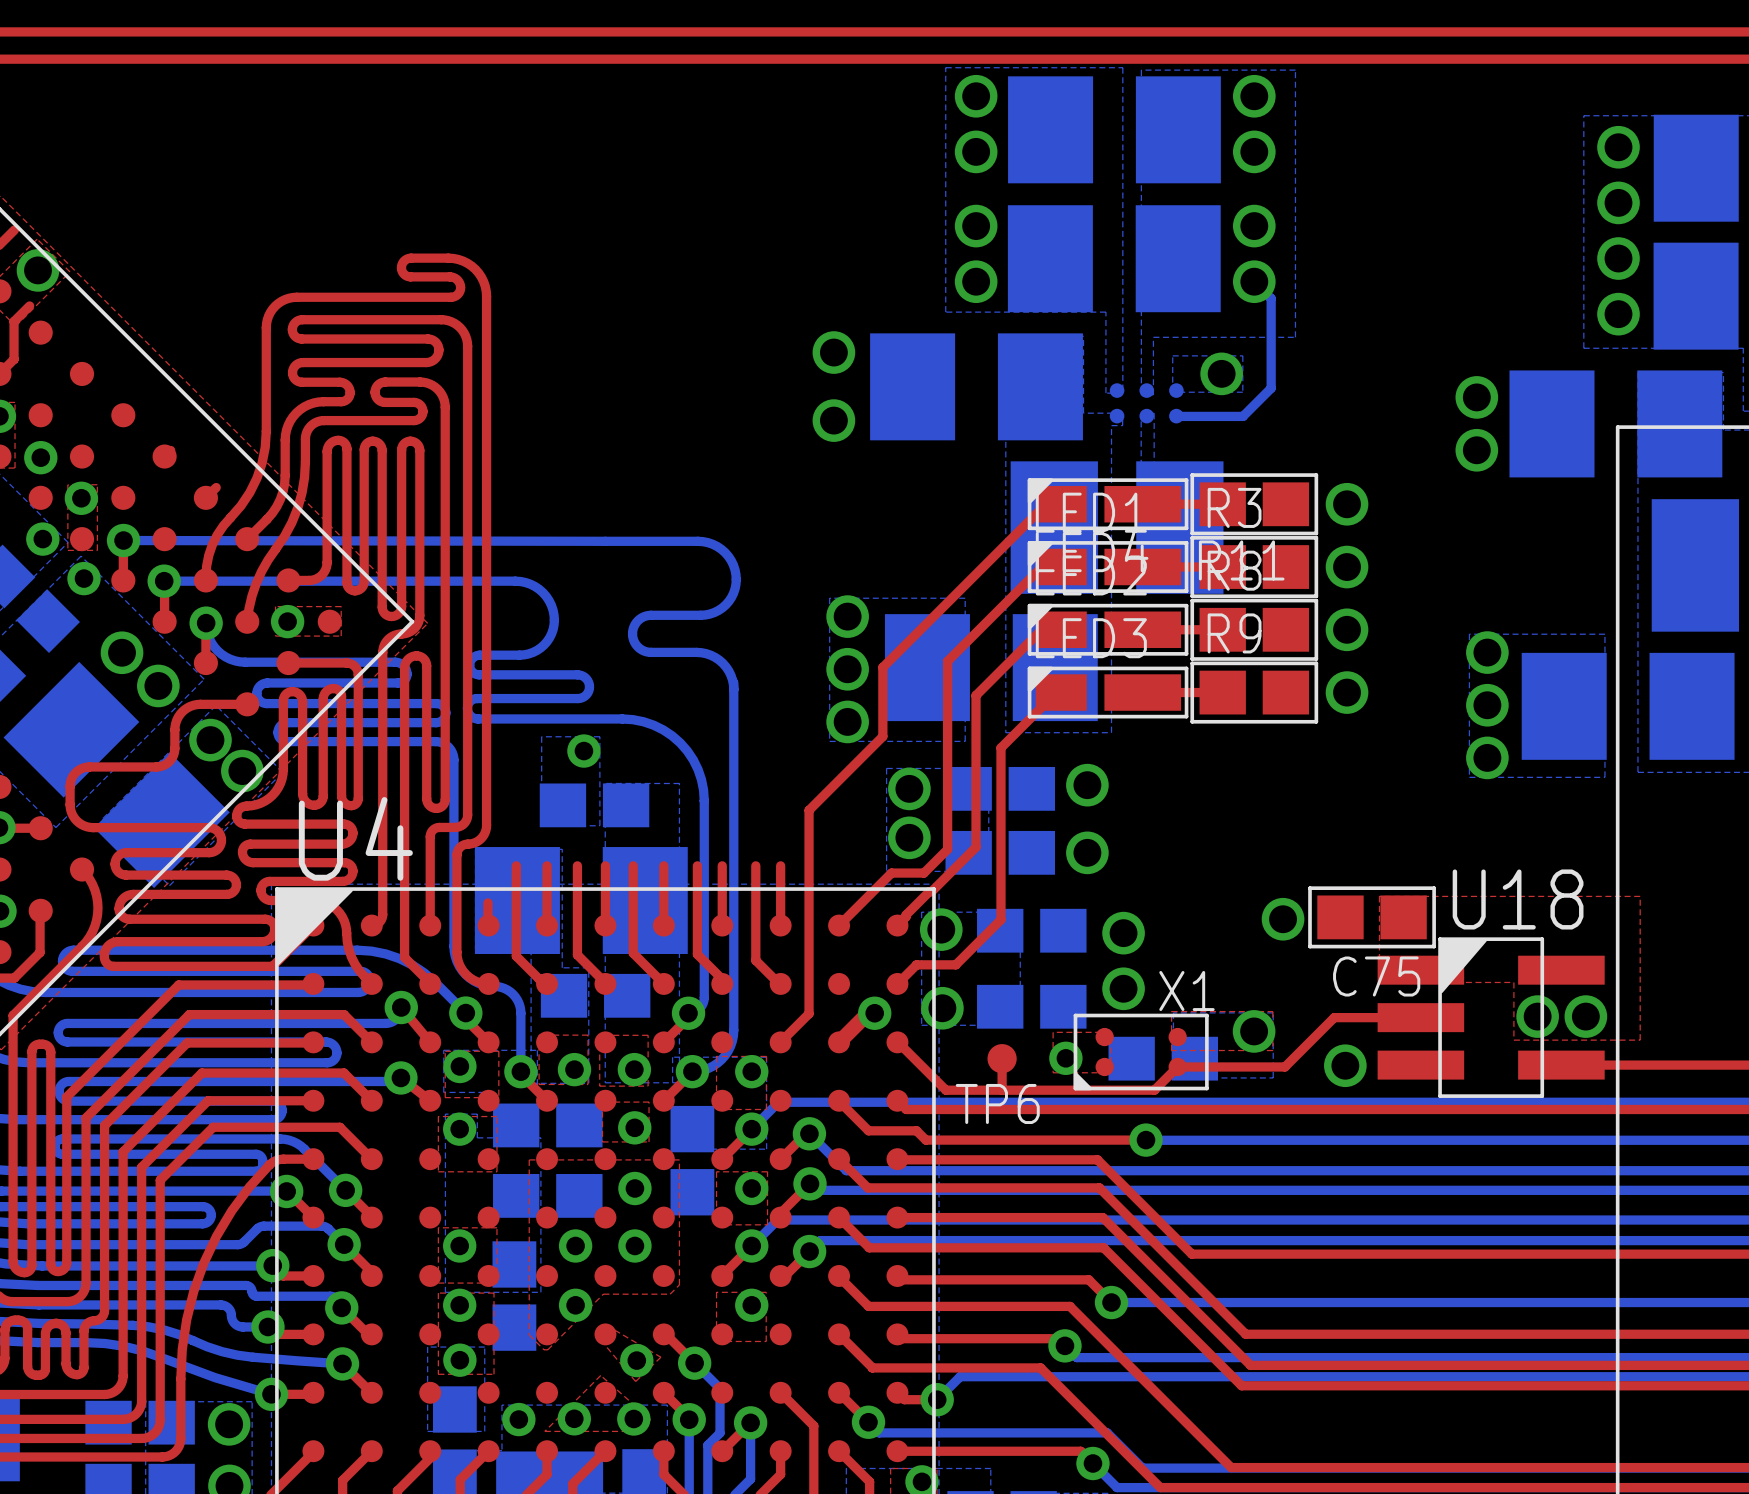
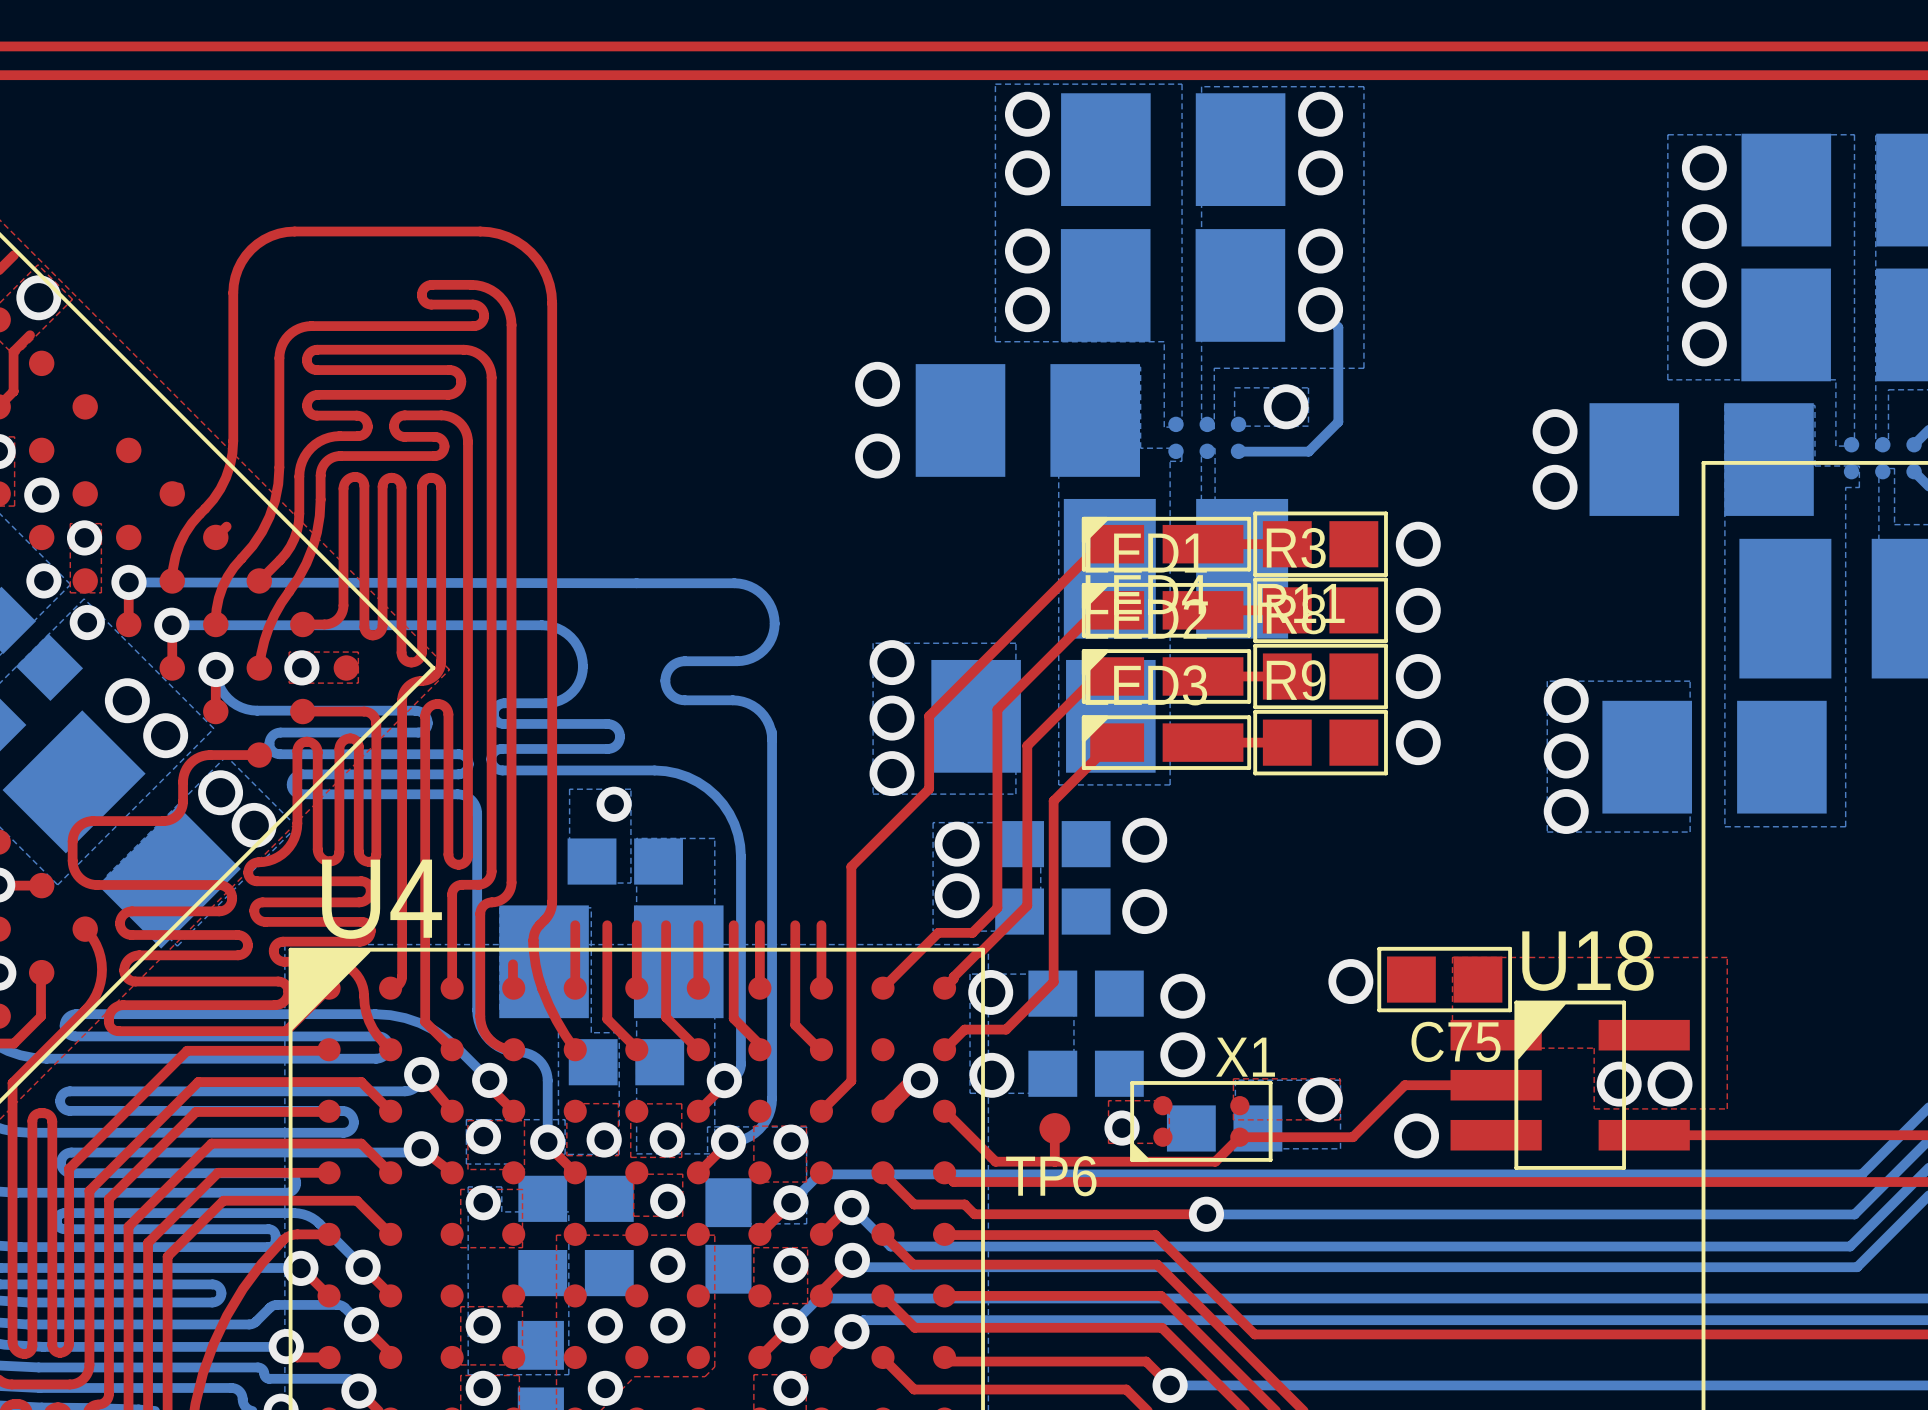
top track: none -> (172, 580) (175, 556) (184, 533) (220, 488) (230, 465) (233, 440) (233, 284) (241, 262) (251, 249) (263, 239) (286, 232) (480, 231) (507, 236) (531, 252) (546, 275) (552, 303) (552, 902) (550, 911) (536, 929) (533, 940)
top track: (516, 865) (516, 956) (539, 979) (542, 979) (547, 983) -> (533, 940) (535, 964) (542, 988) (556, 1020) (575, 1049)

